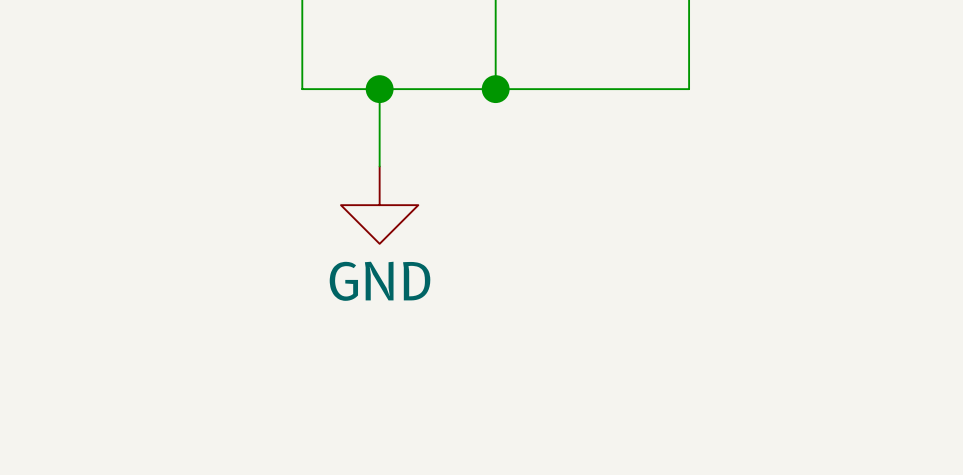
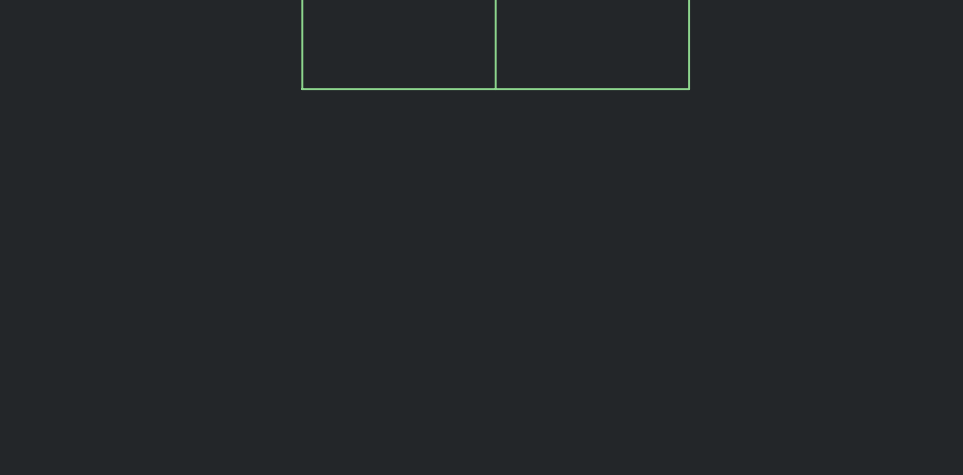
wire: (379, 89) (379, 166) -> none
junction: (379, 89) -> none
junction: (495, 89) -> none
power symbol: GND (379, 205) -> none

